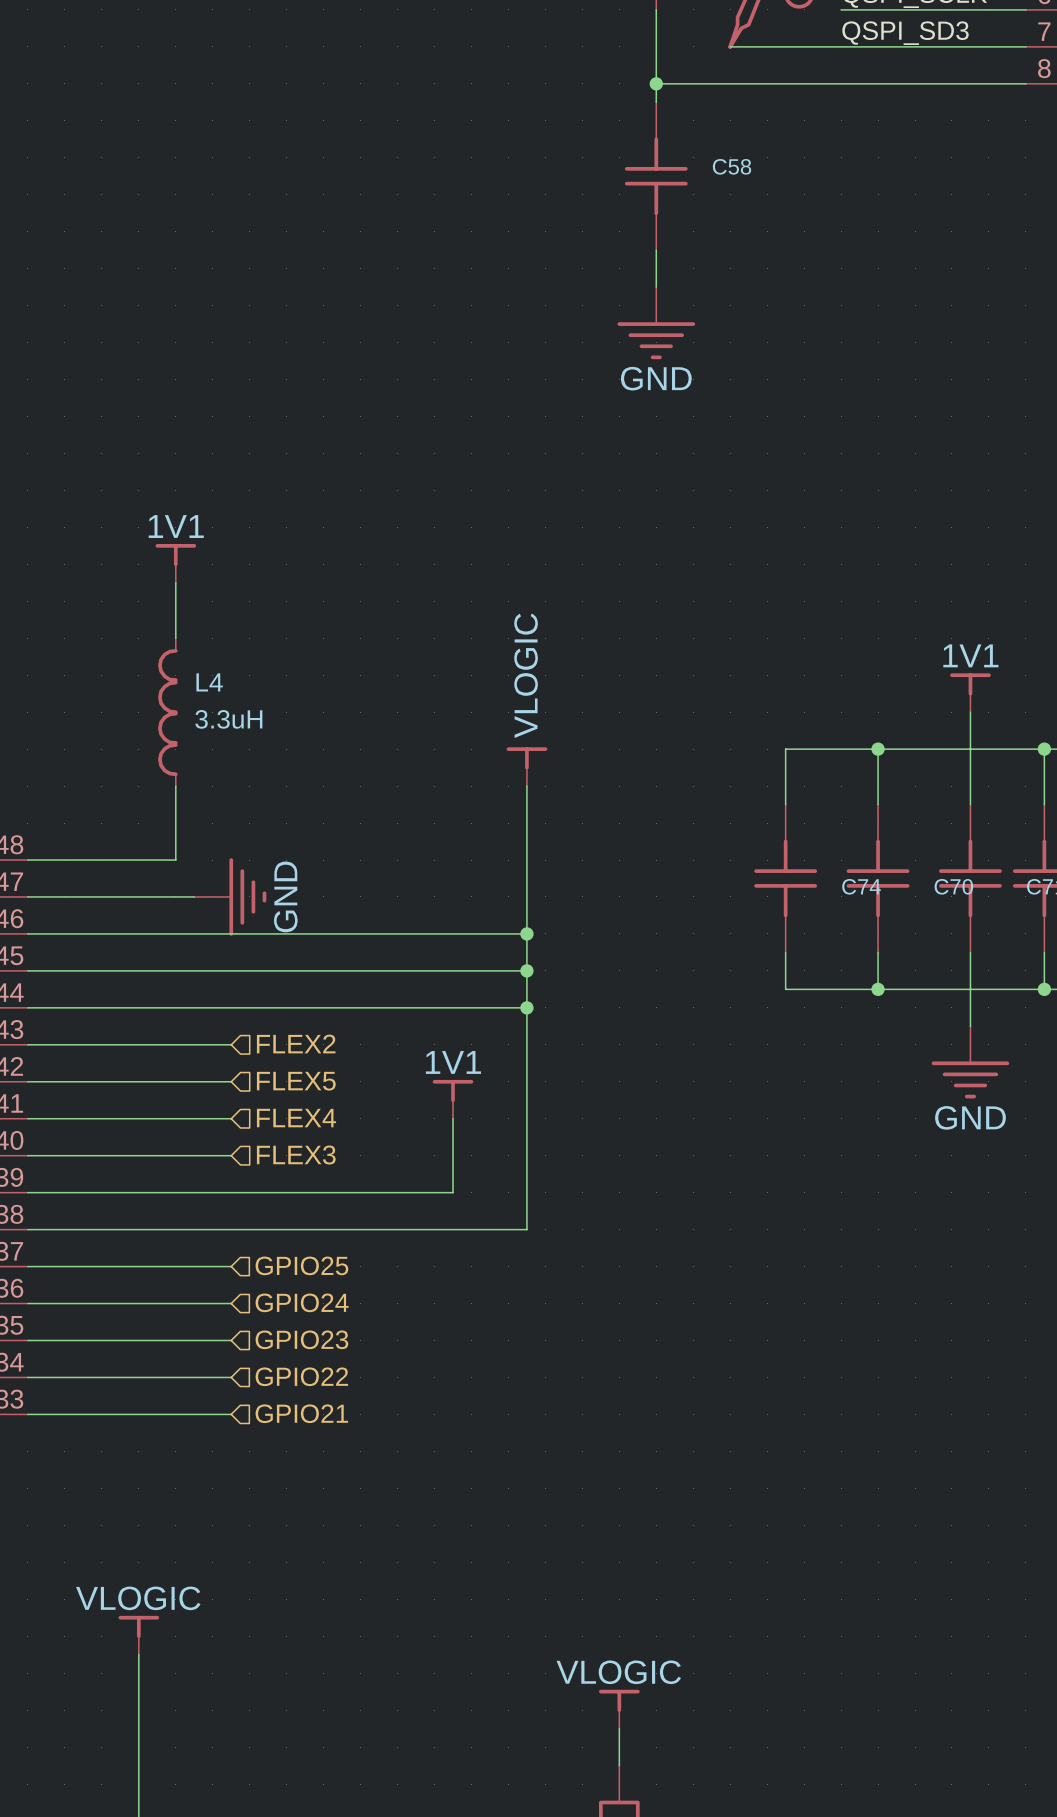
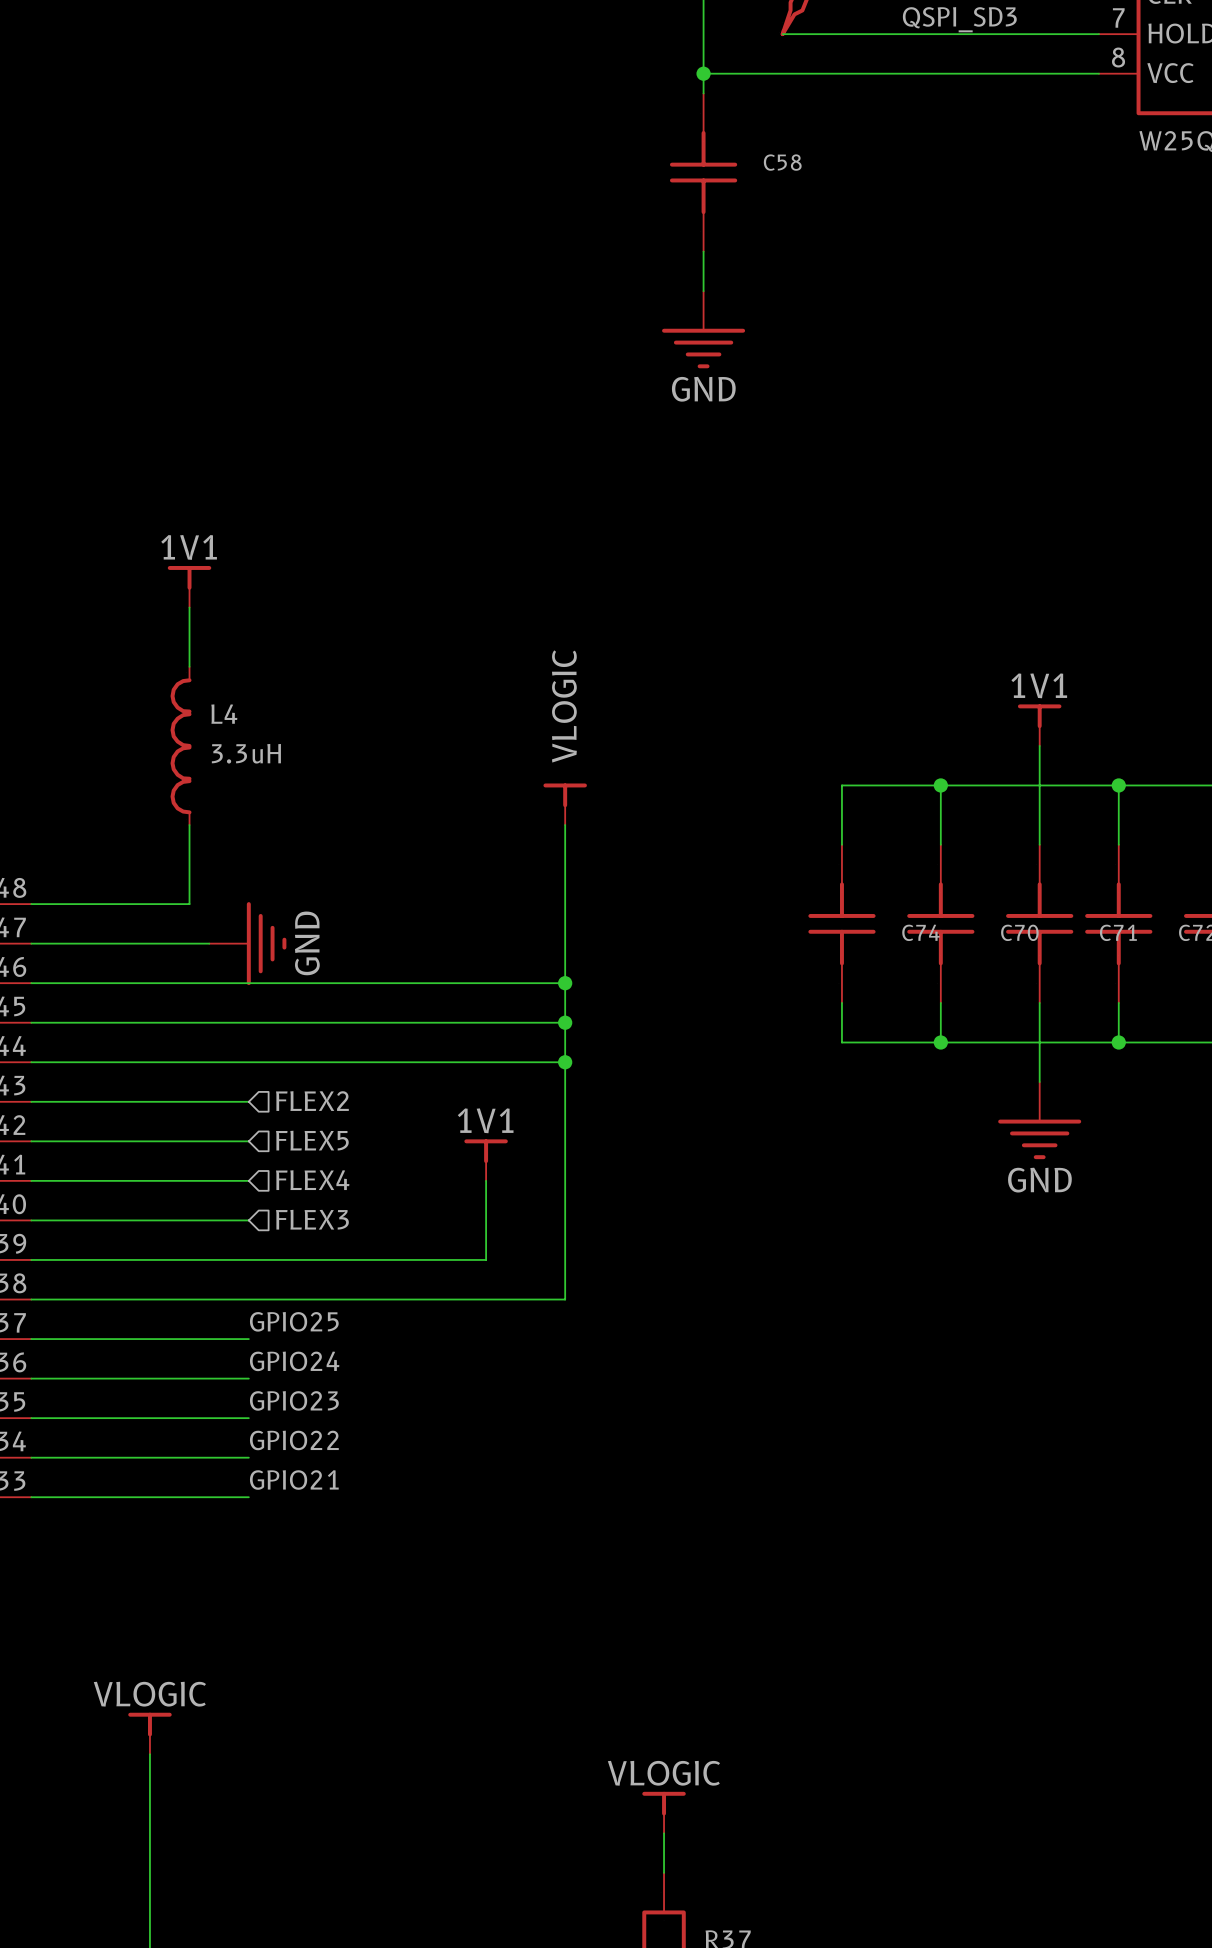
label: none -> GPIO25 (294, 1321)
hierarchical label: GPIO25 (301, 1265) -> none
label: none -> GPIO24 (294, 1361)
hierarchical label: GPIO24 (302, 1302) -> none
label: none -> GPIO23 (294, 1400)
hierarchical label: GPIO23 (301, 1339) -> none
label: none -> GPIO22 (294, 1440)
hierarchical label: GPIO22 (301, 1376) -> none
label: none -> GPIO21 (294, 1480)
hierarchical label: GPIO21 (301, 1413) -> none

